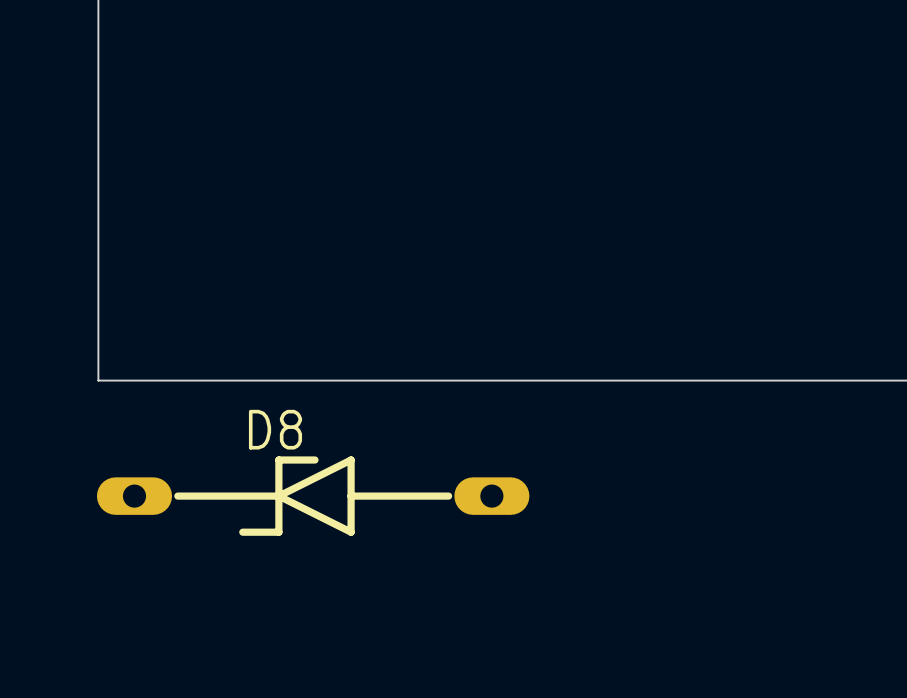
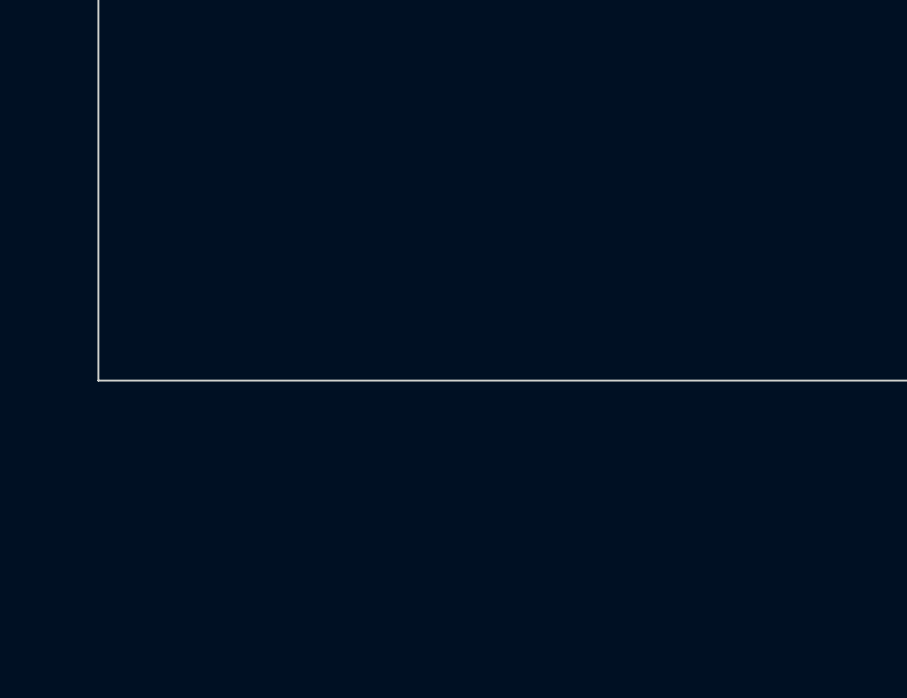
D8: (313, 496) -> none

